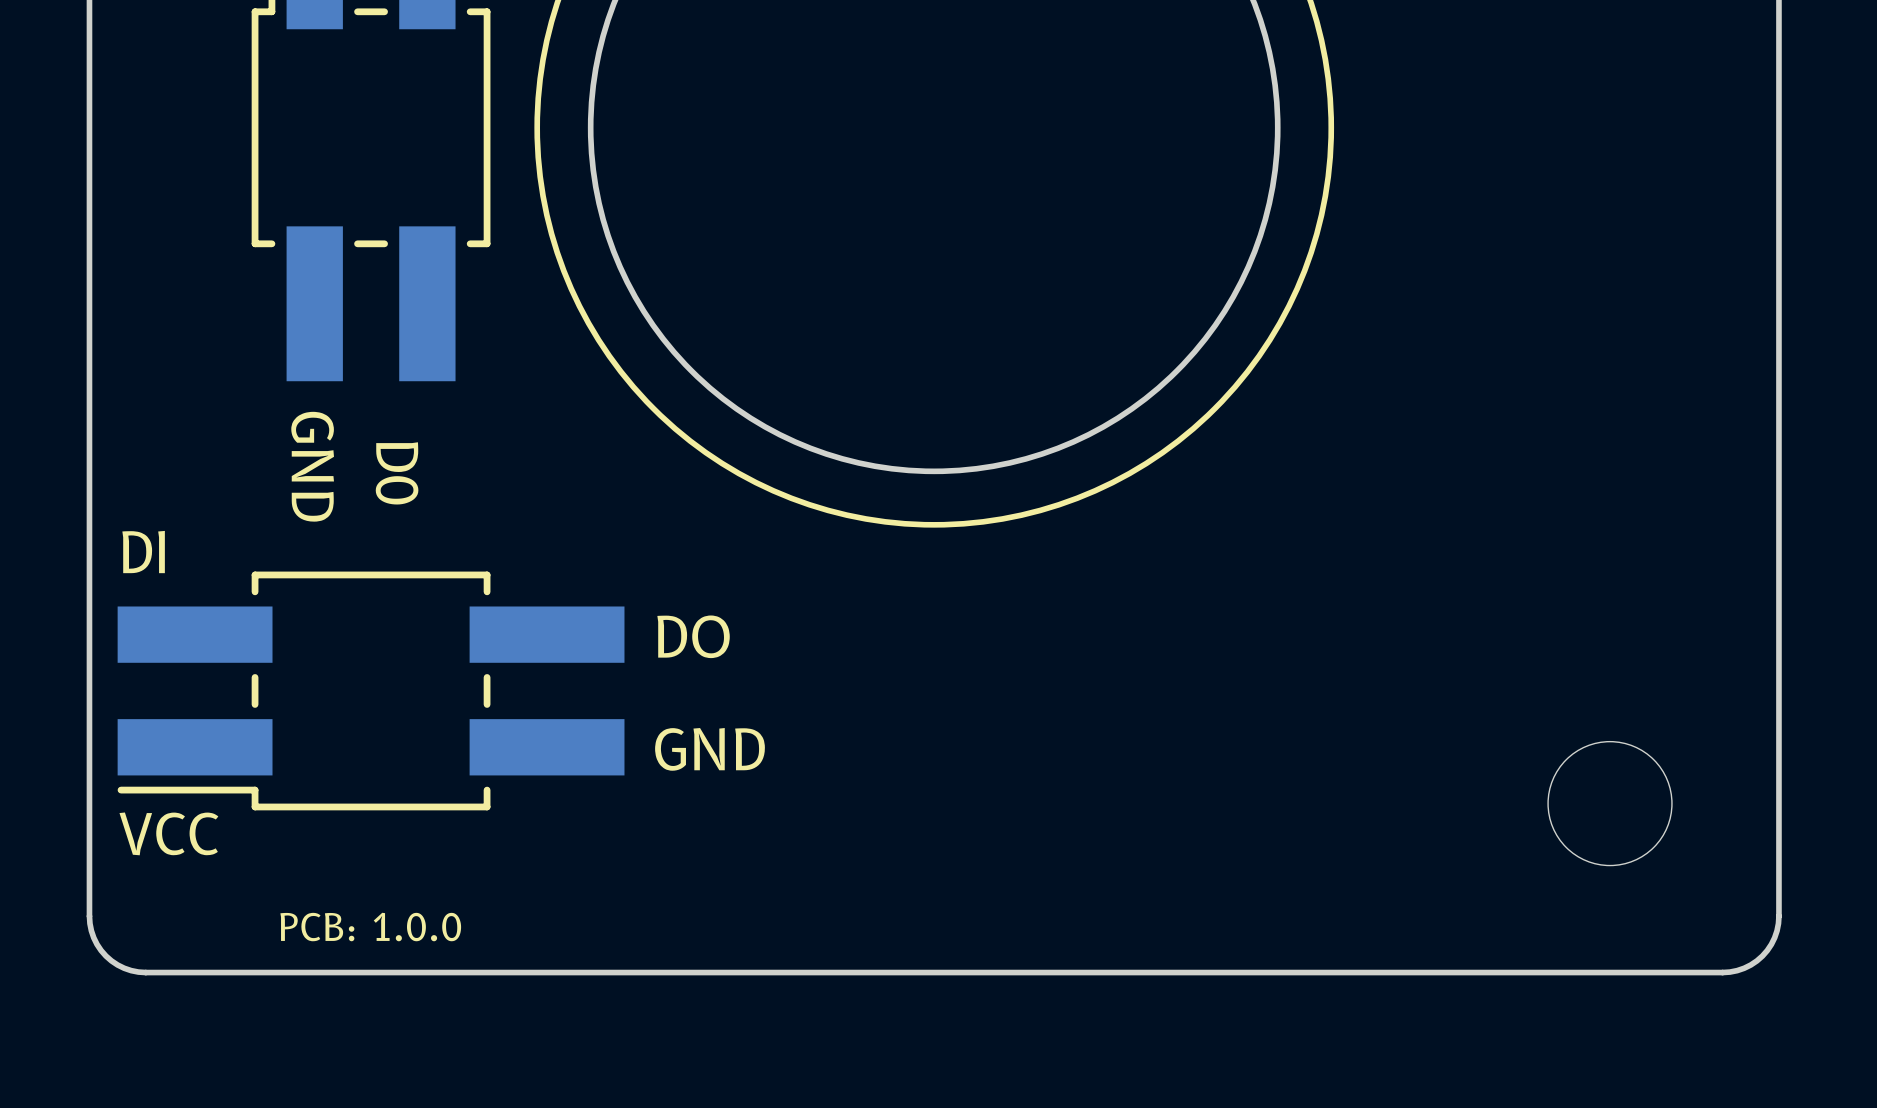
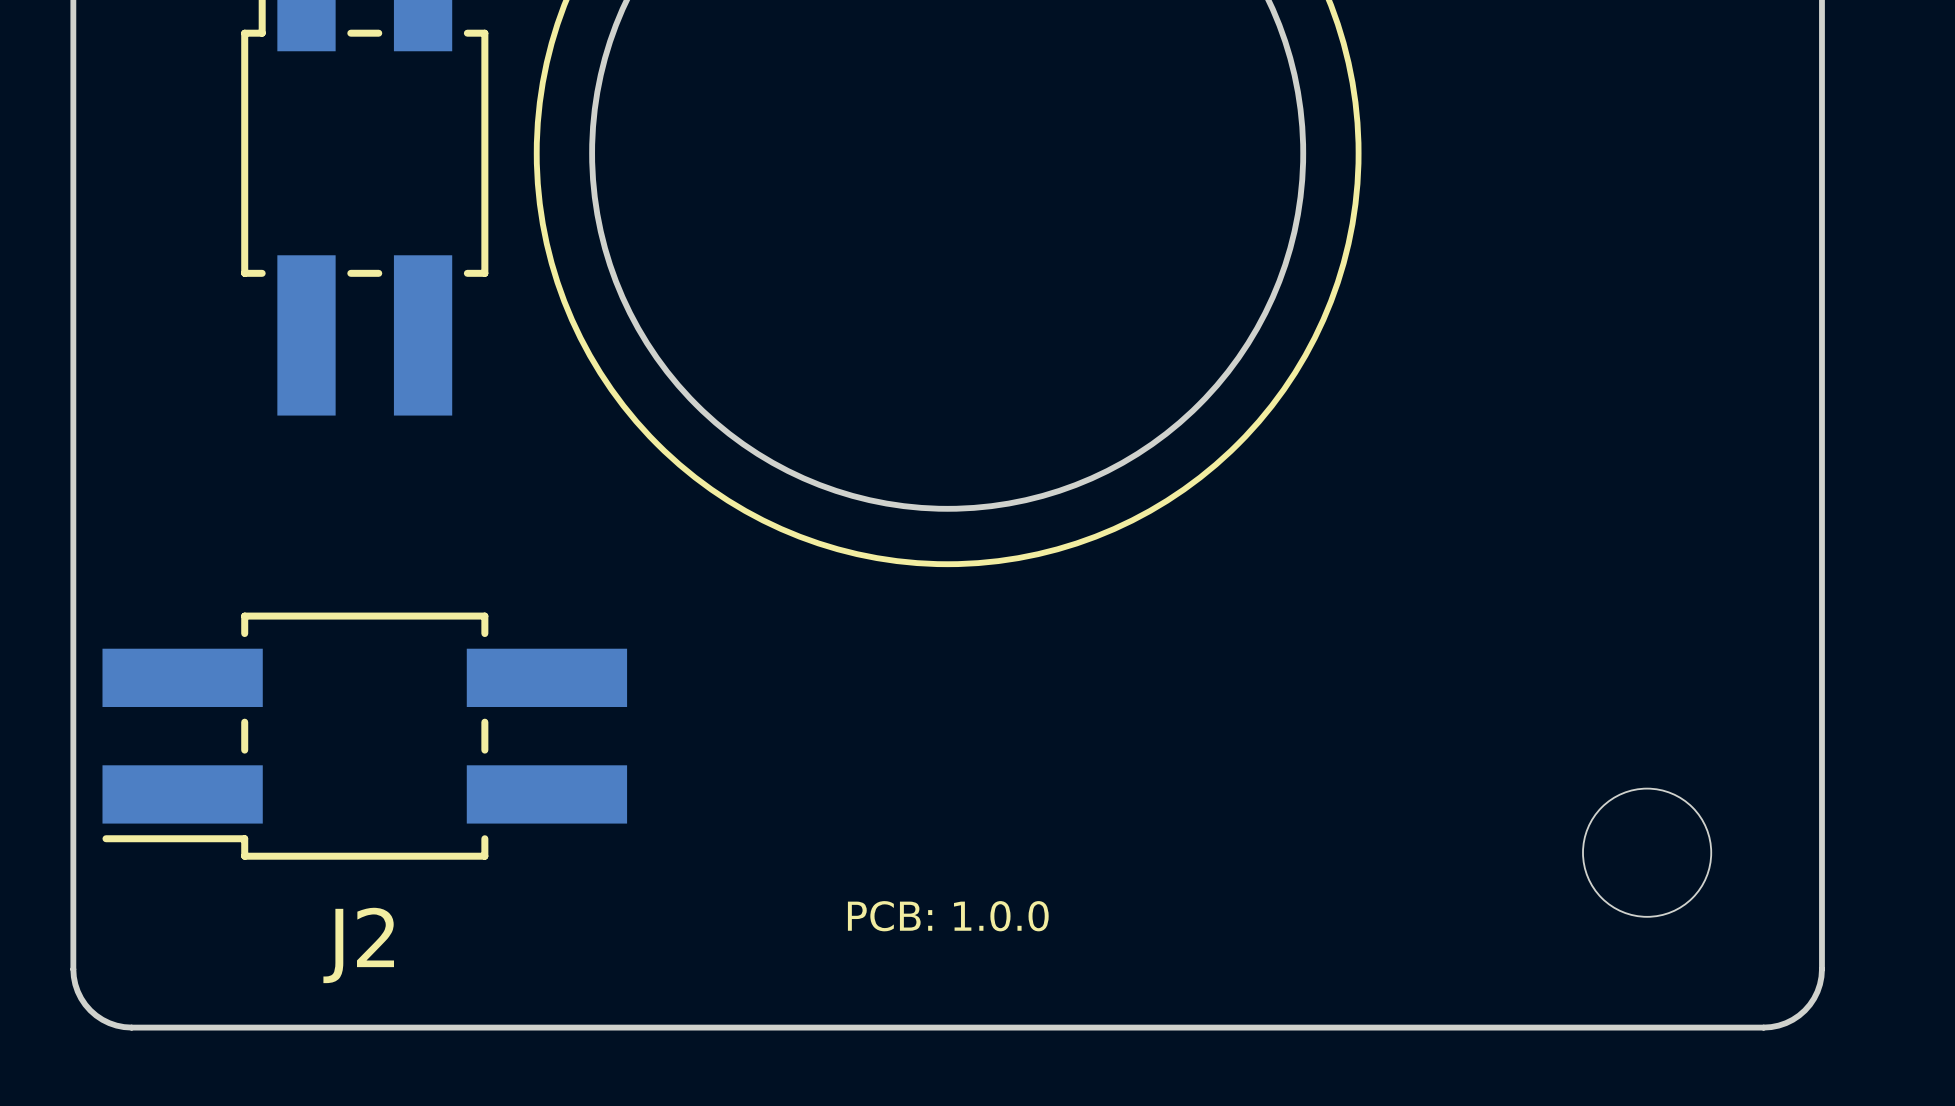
text: GND (312, 466) -> none
text: D0 (397, 473) -> none
text: DI (143, 552) -> none
text: DO (693, 636) -> none
text: GND (709, 749) -> none
text: VCC (168, 833) -> none
J2 name: none -> J2 (358, 945)
text position: PCB: 1.0.0 (370, 927) -> PCB: 1.0.0 (948, 916)

